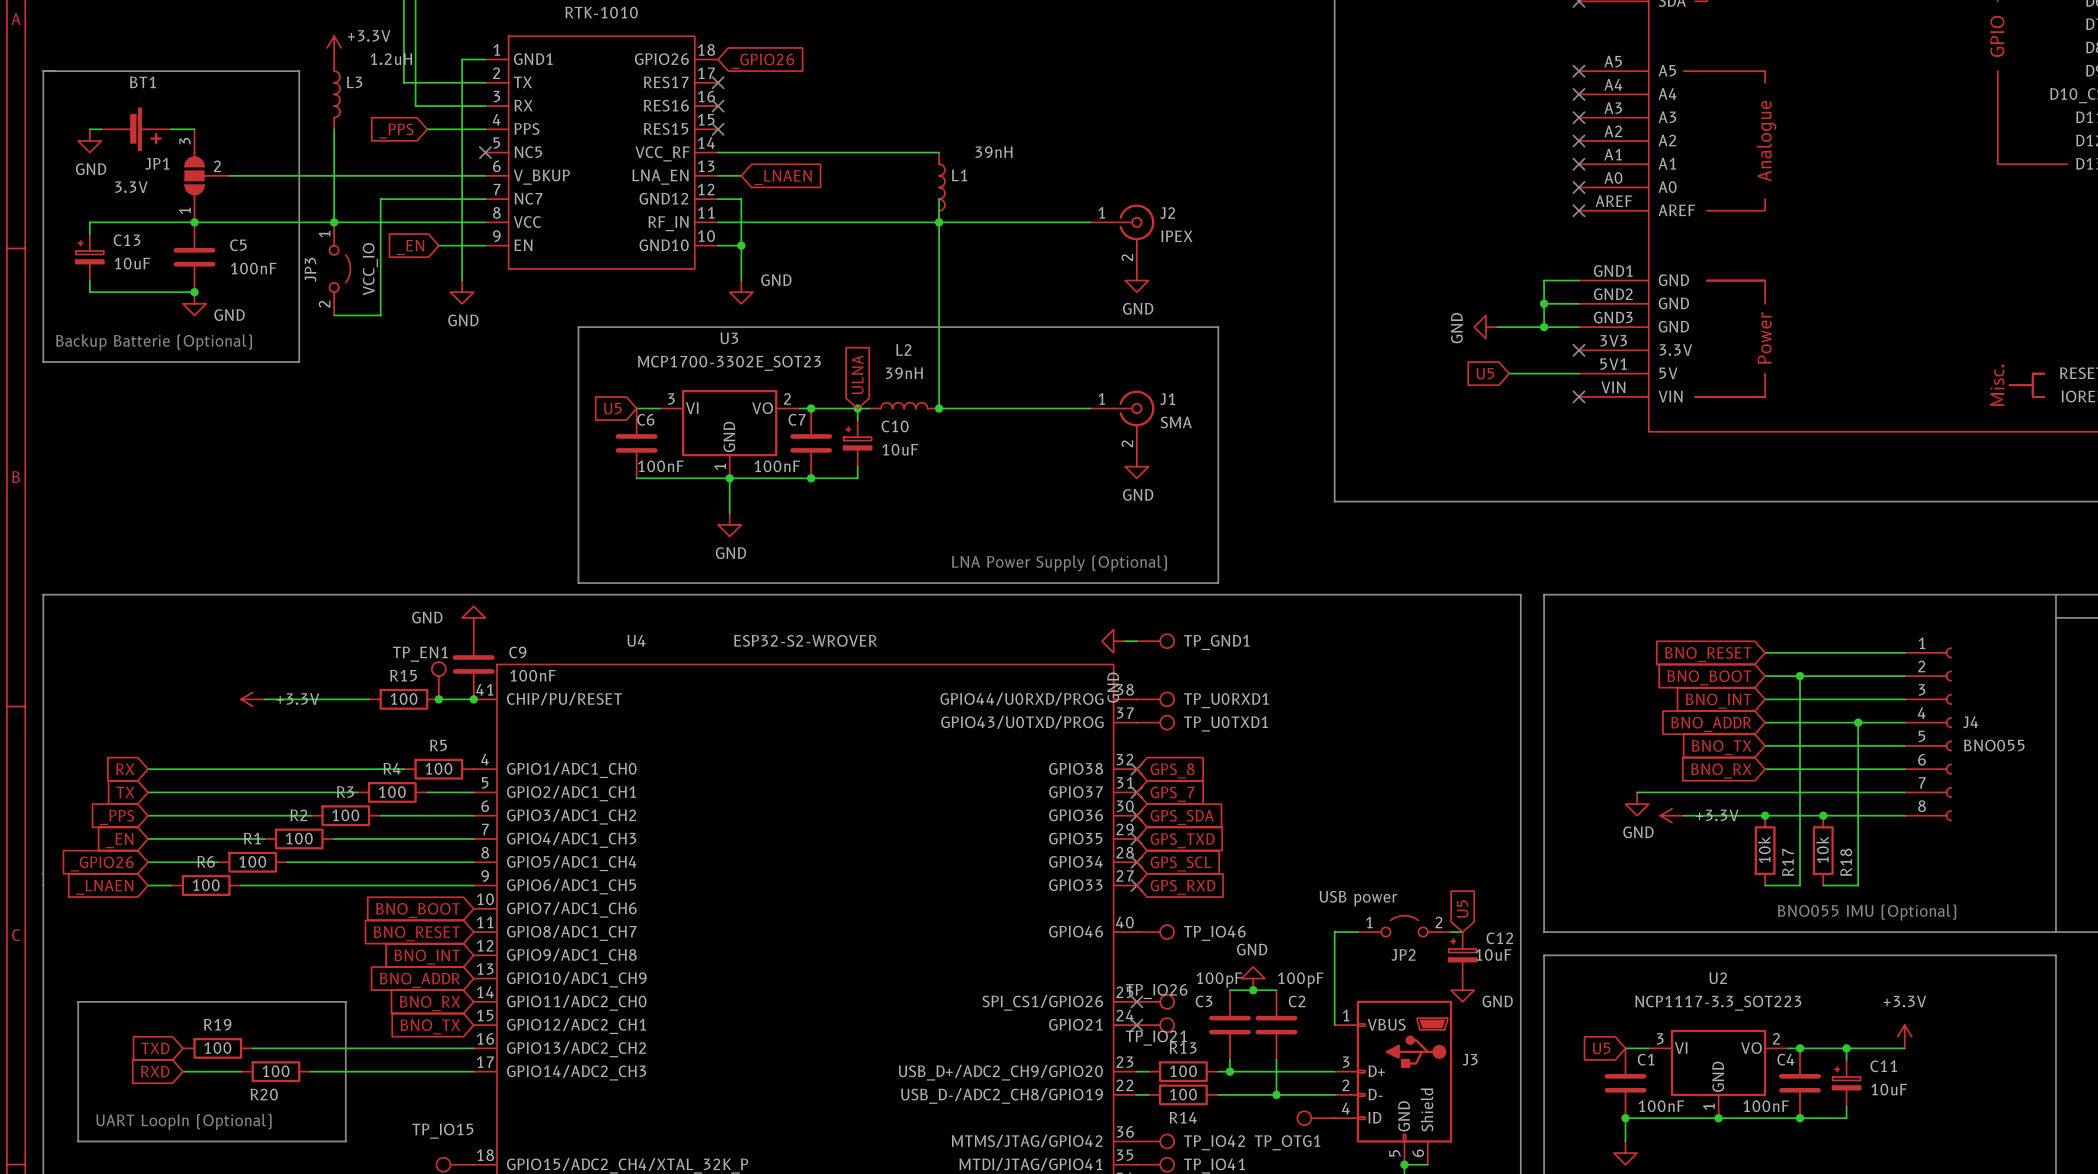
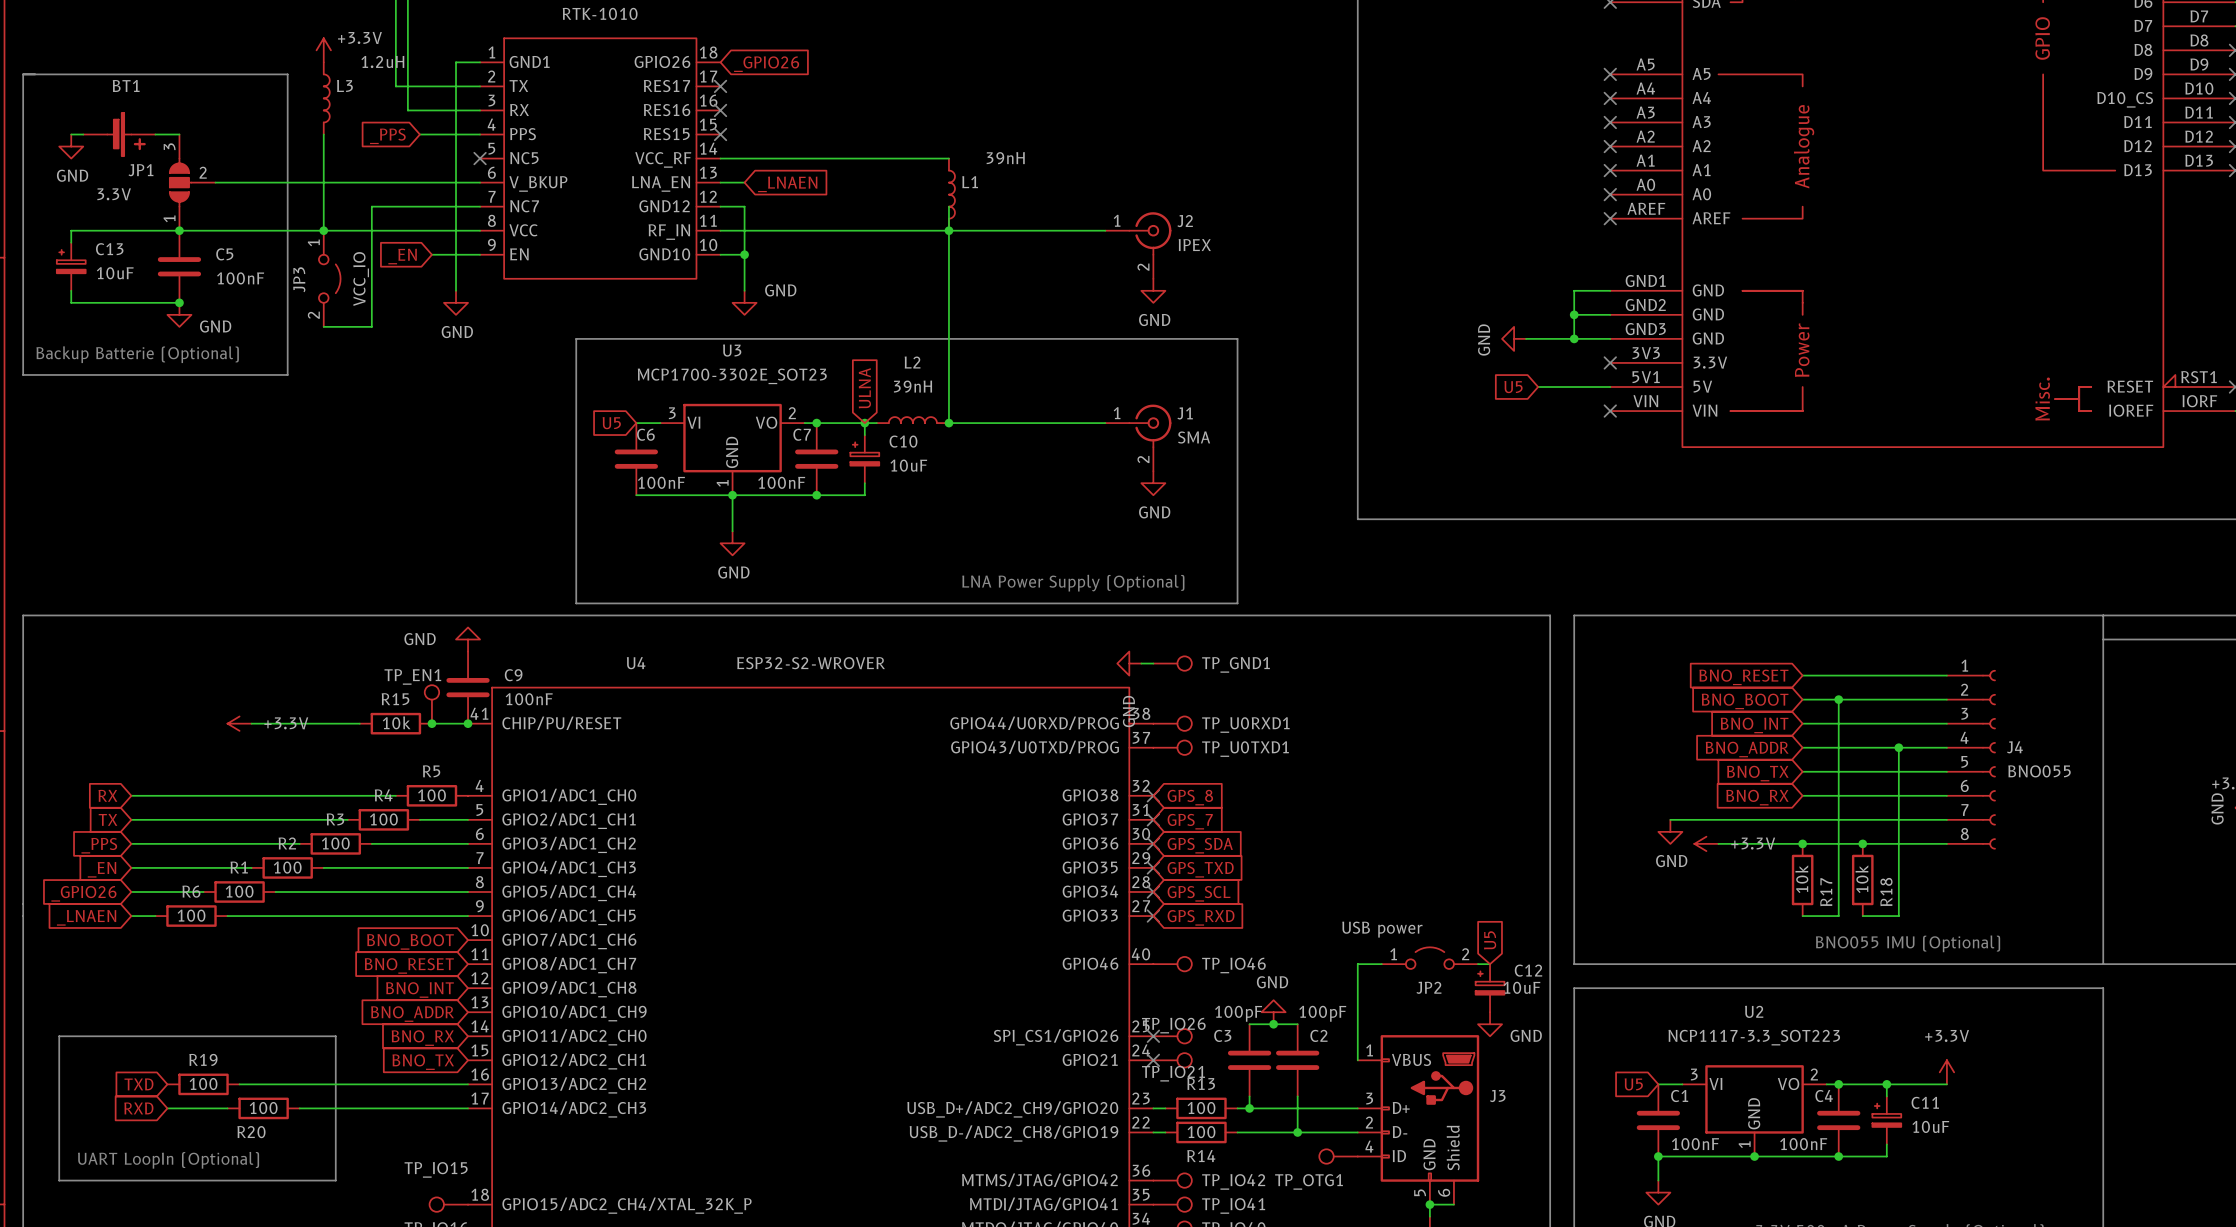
R15 value: 100 (403, 699) -> 10k (396, 722)

